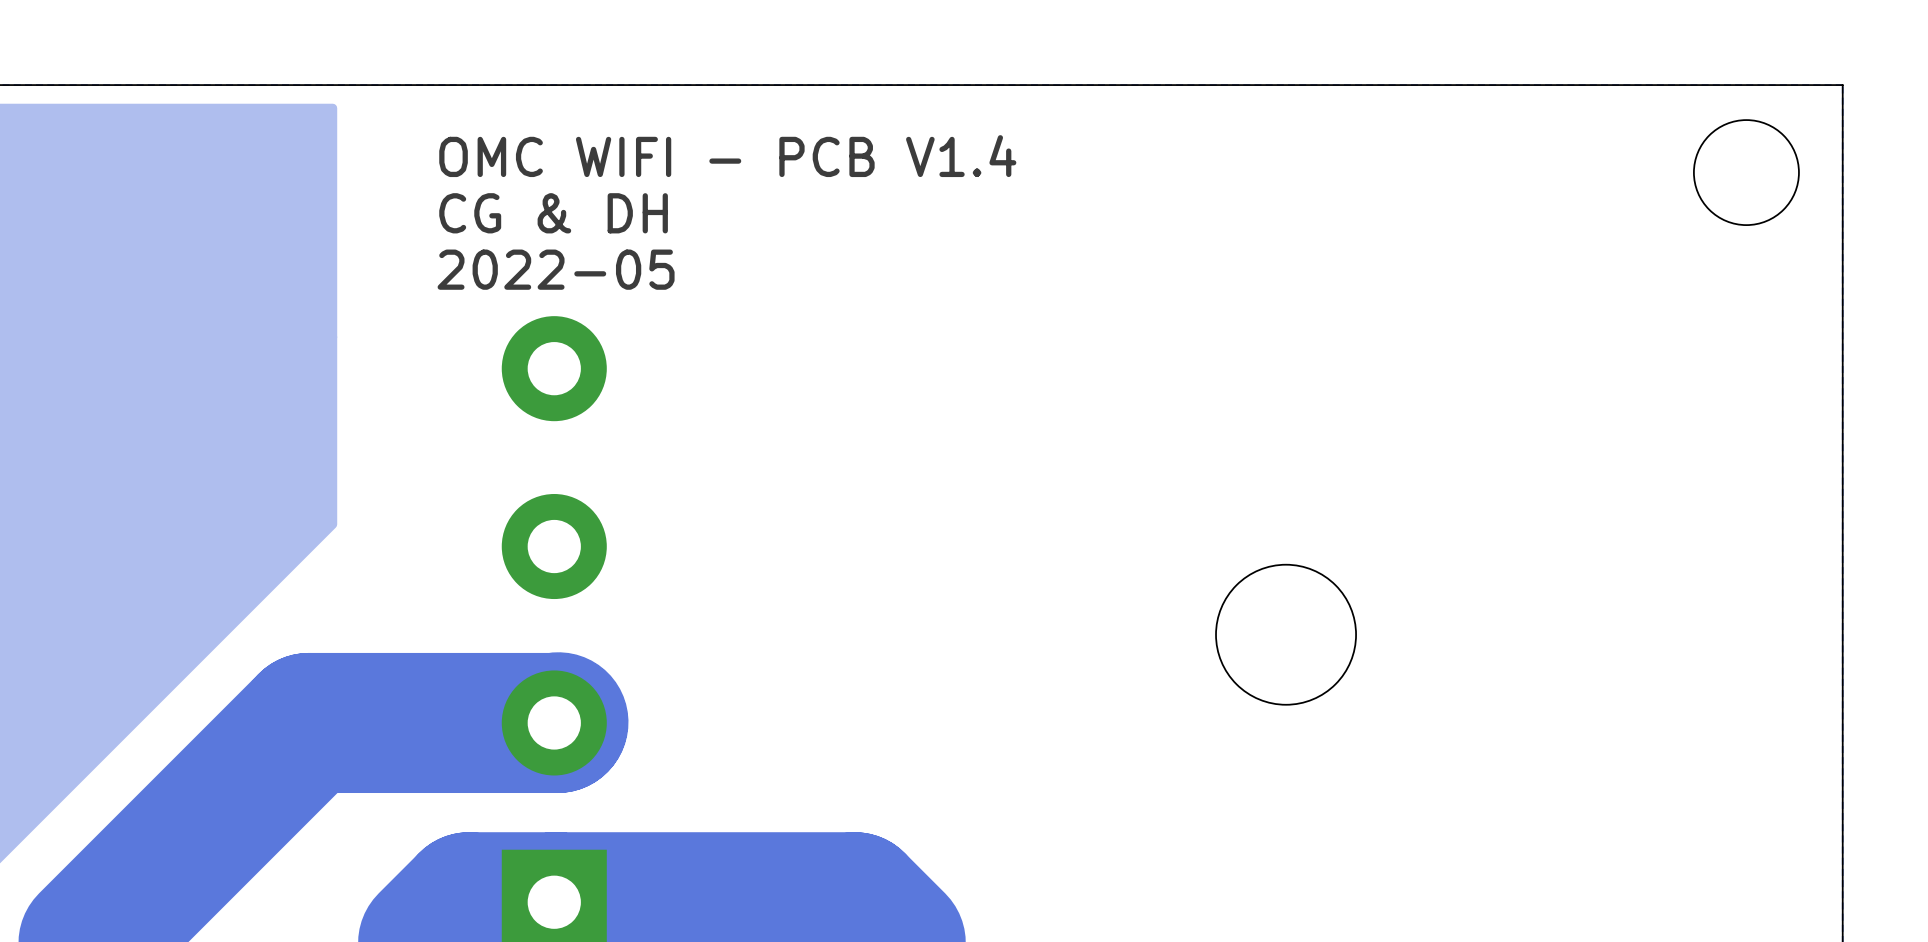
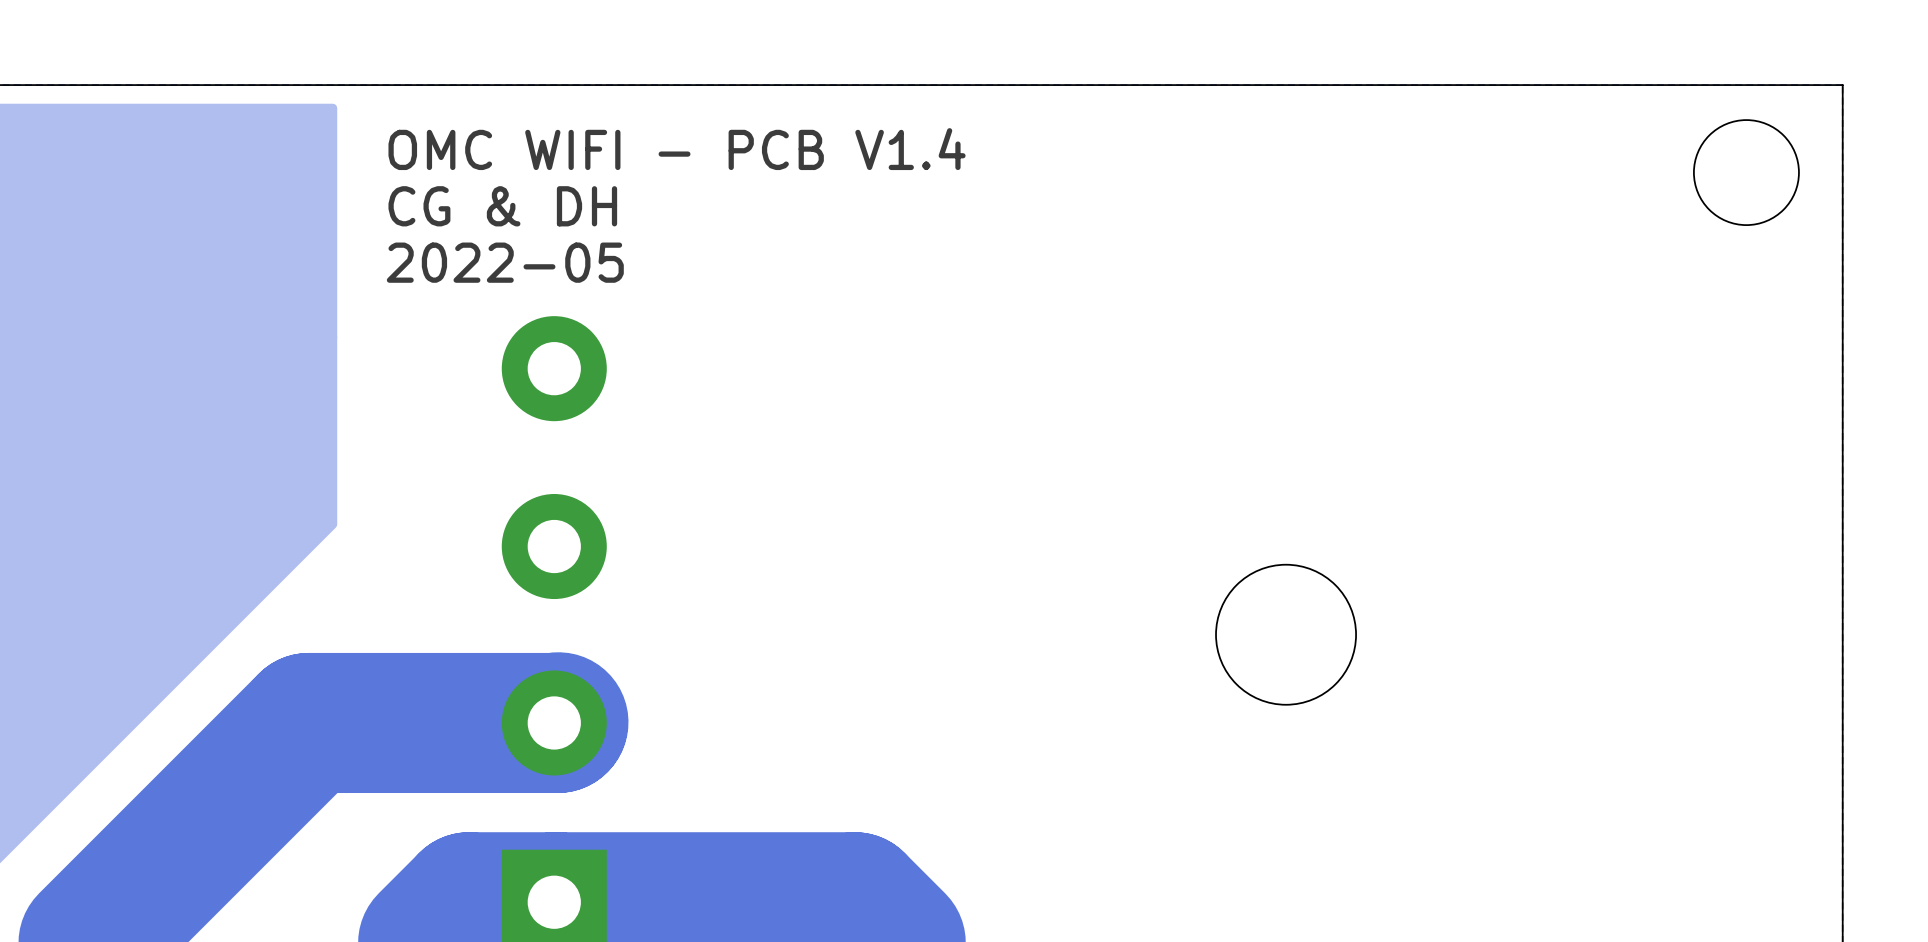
text position: OMC WIFI - PCB V1.4 (727, 156) -> OMC WIFI - PCB V1.4 (677, 149)
text position: CG & DH (553, 213) -> CG & DH (502, 206)
text position: 2022-05 (556, 269) -> 2022-05 (505, 262)

